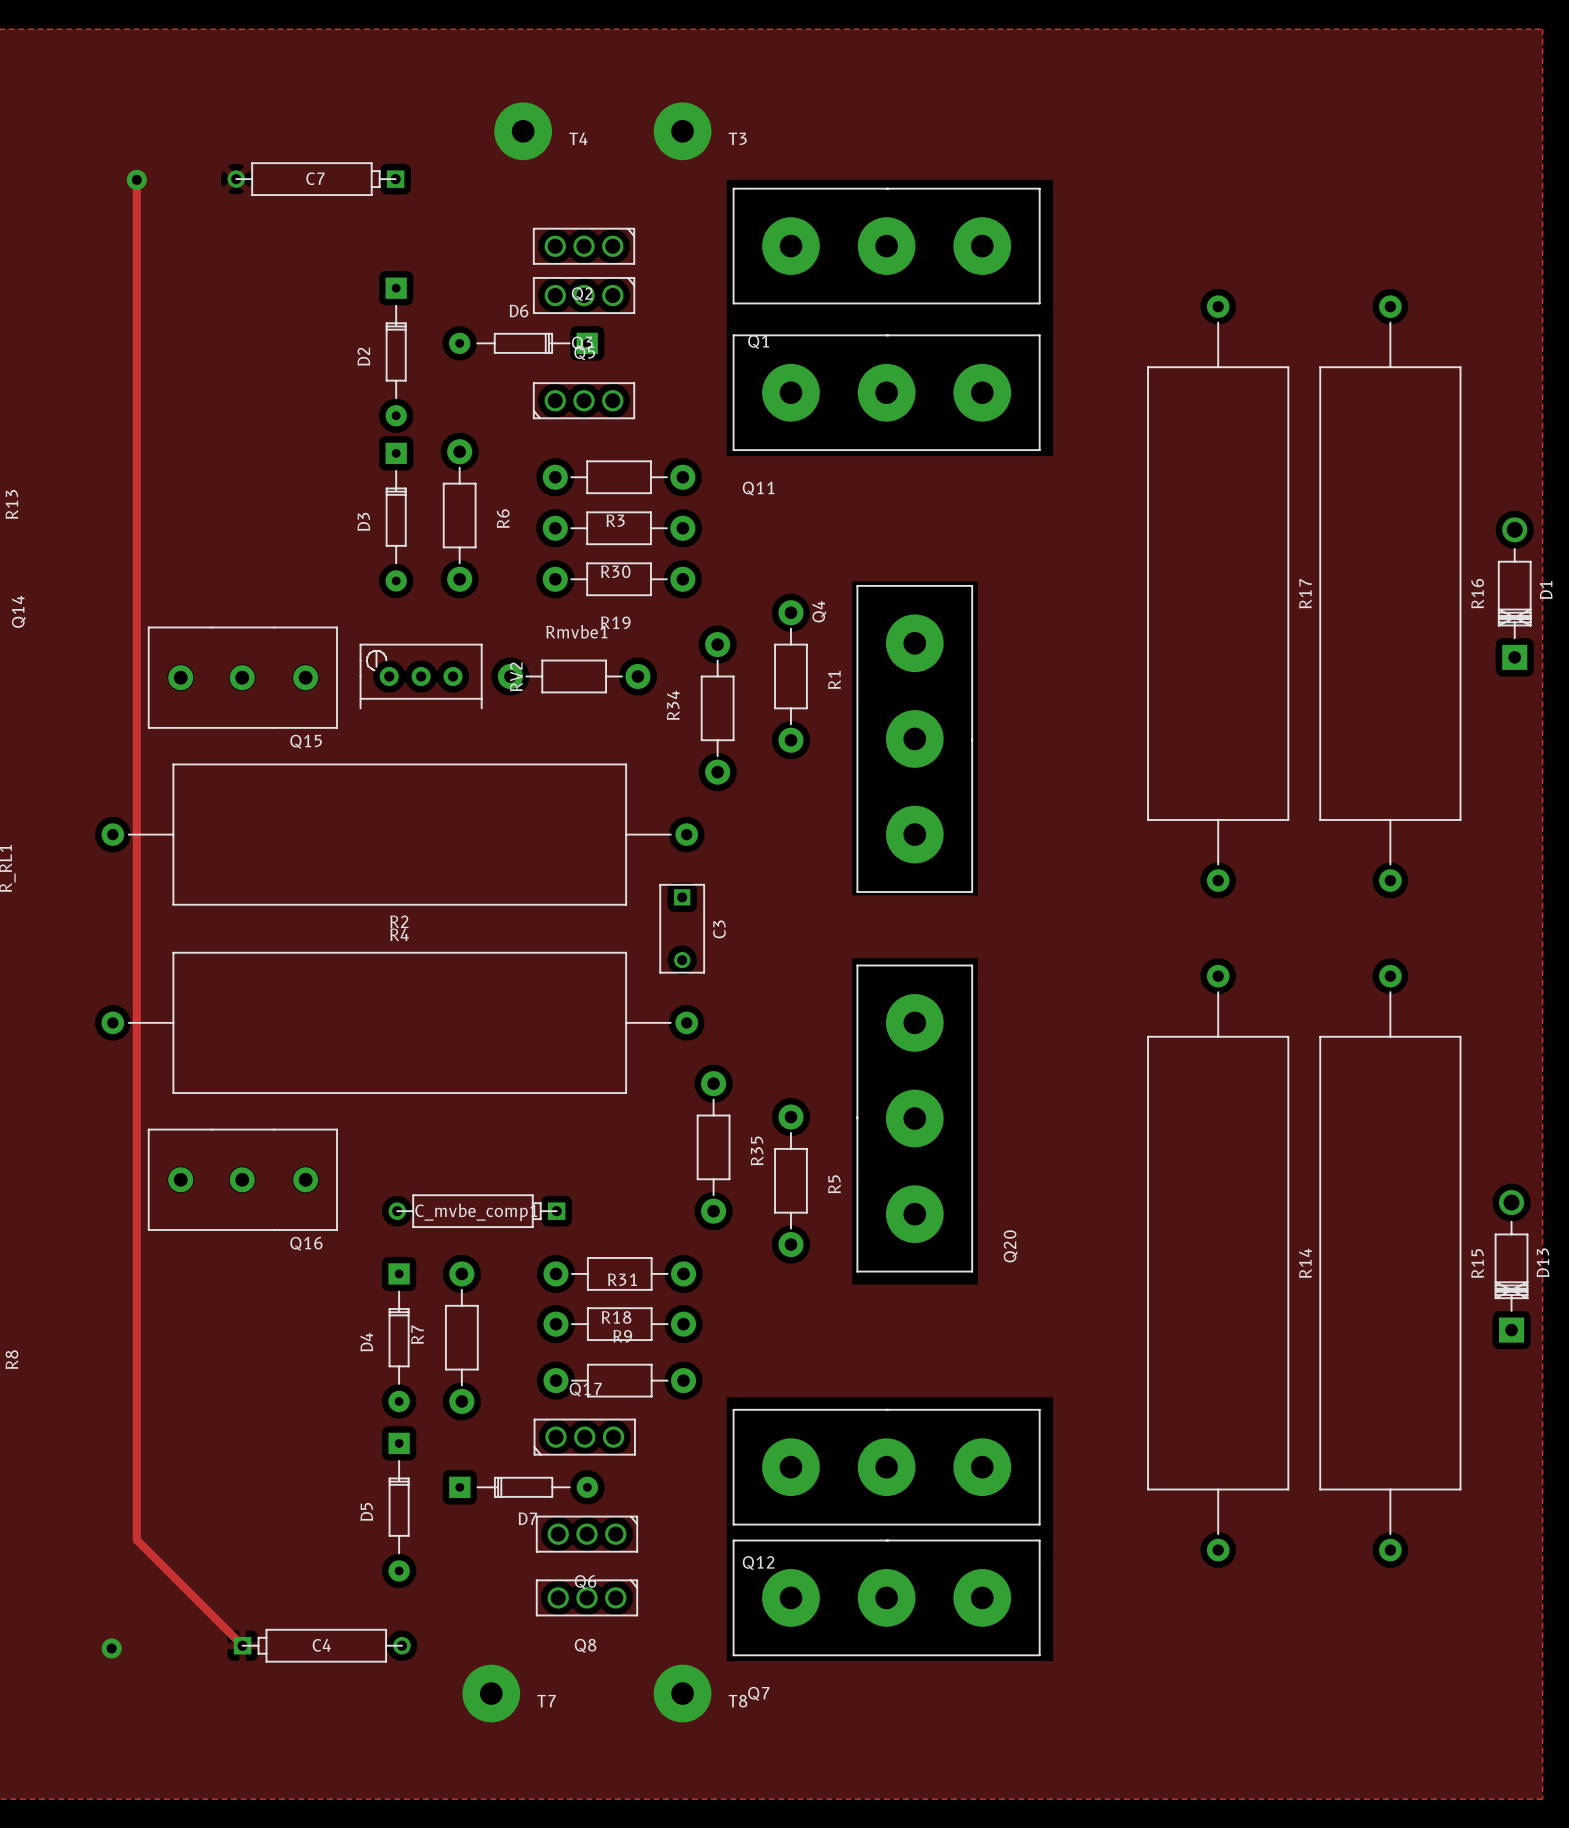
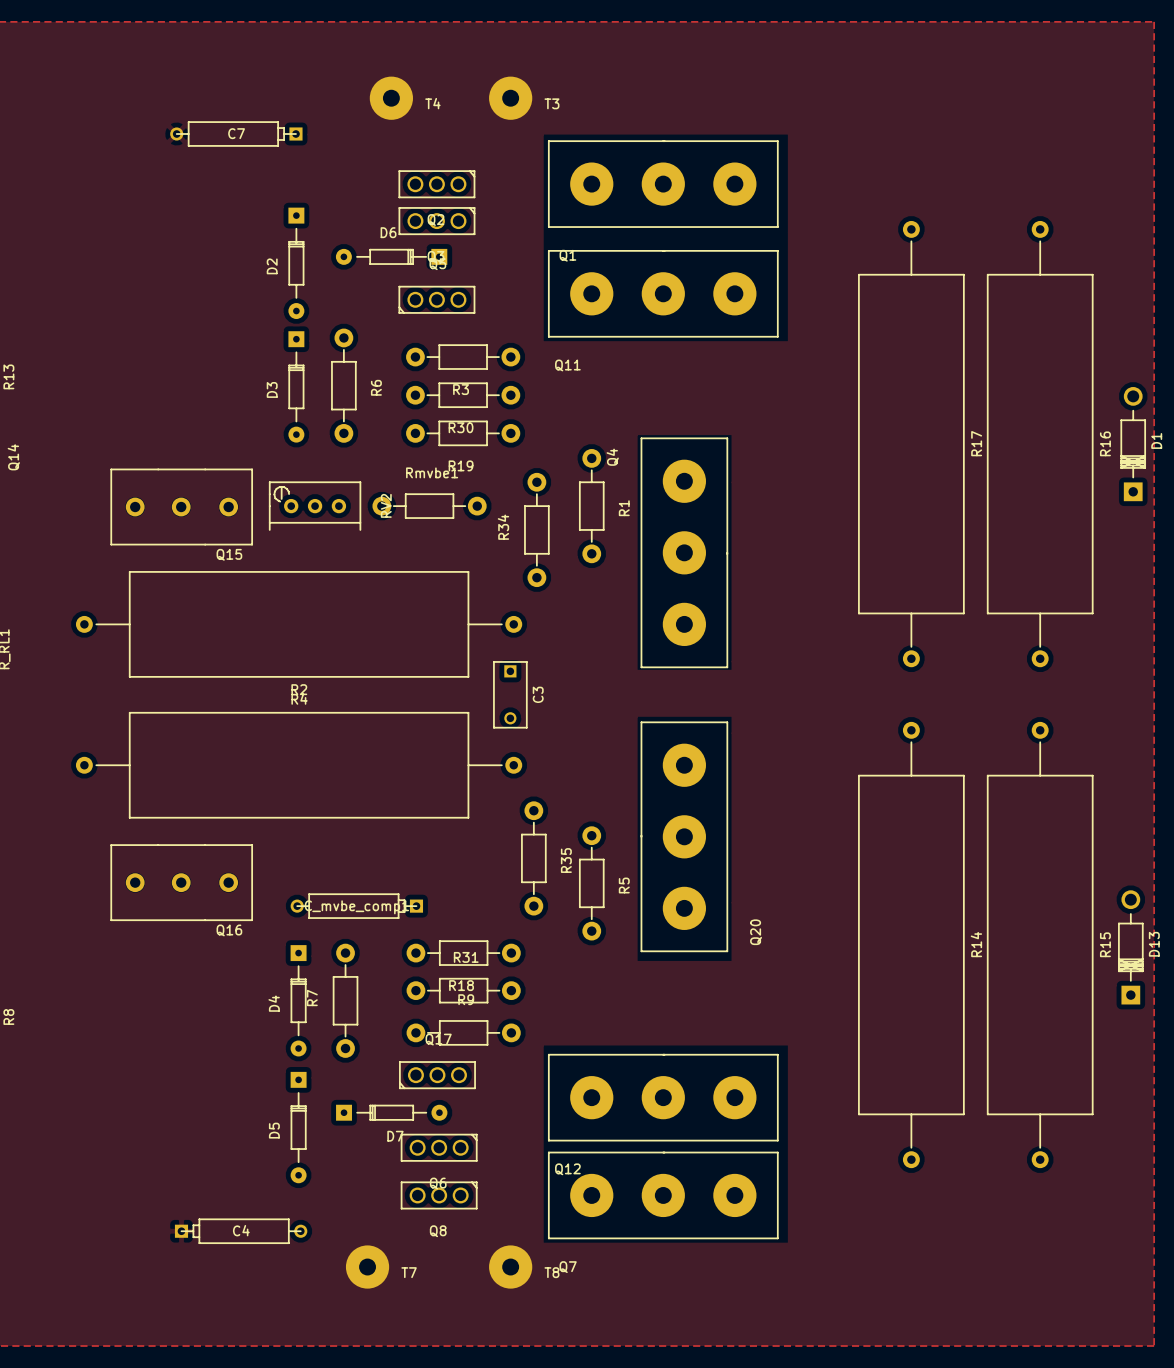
track: (136, 179) (136, 1539) (242, 1645) -> none
via: (136, 179) -> none
via: (111, 1648) -> none

